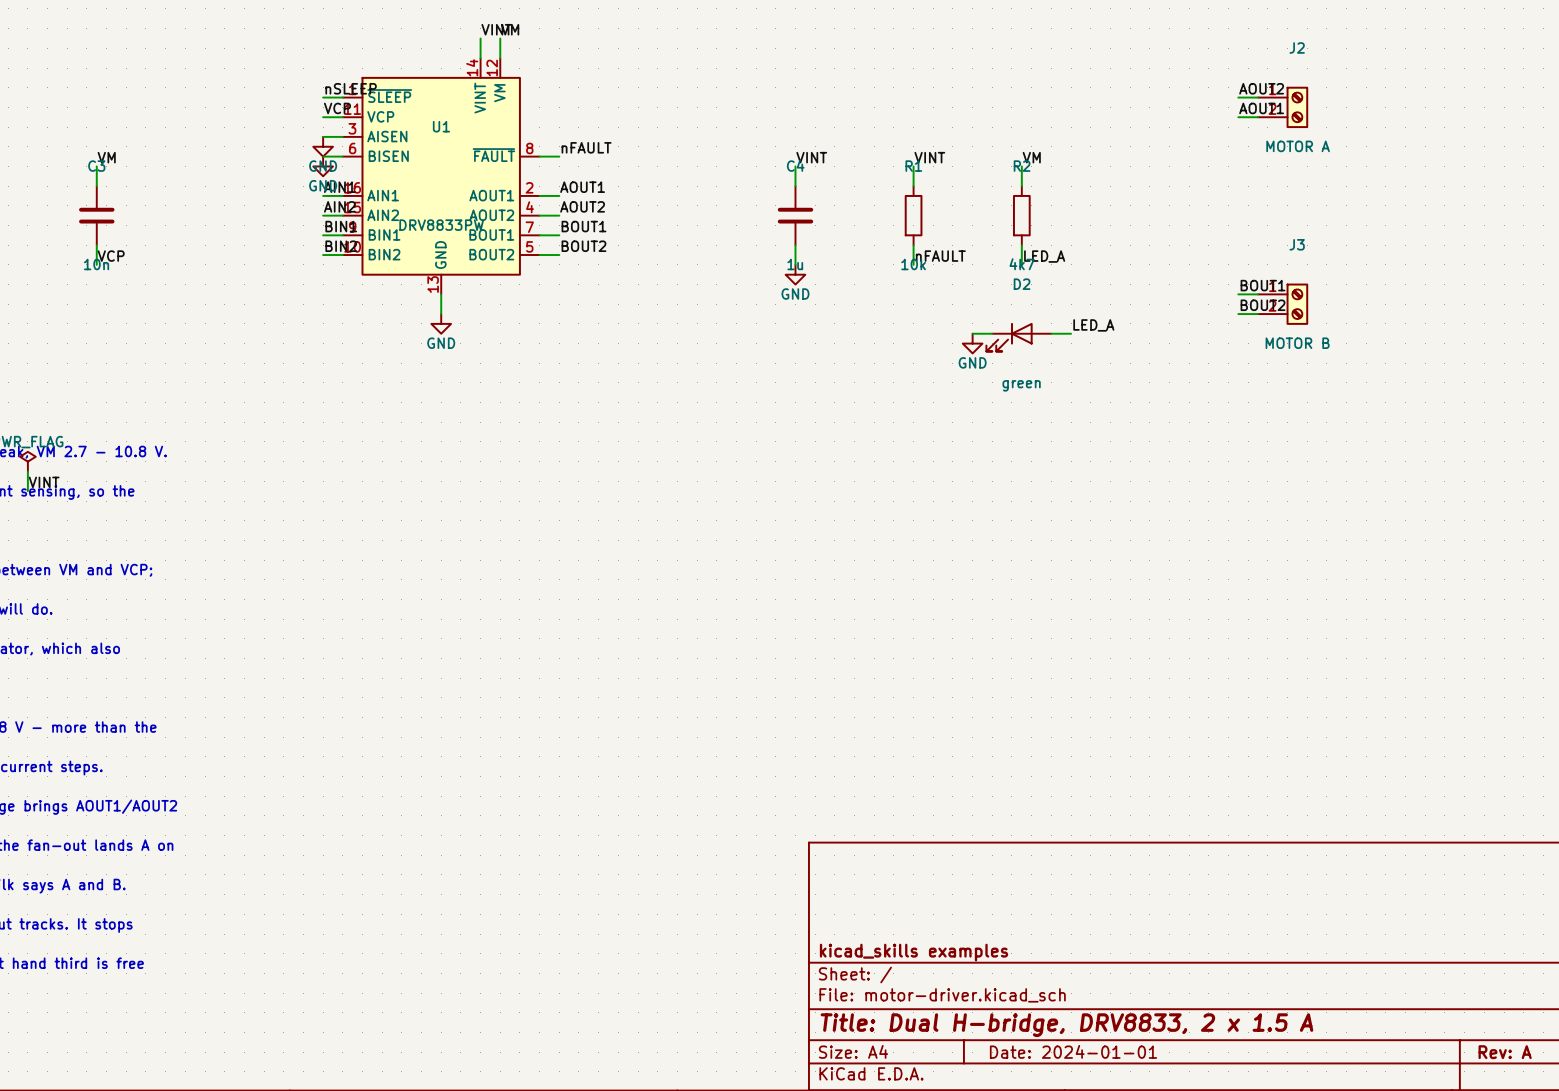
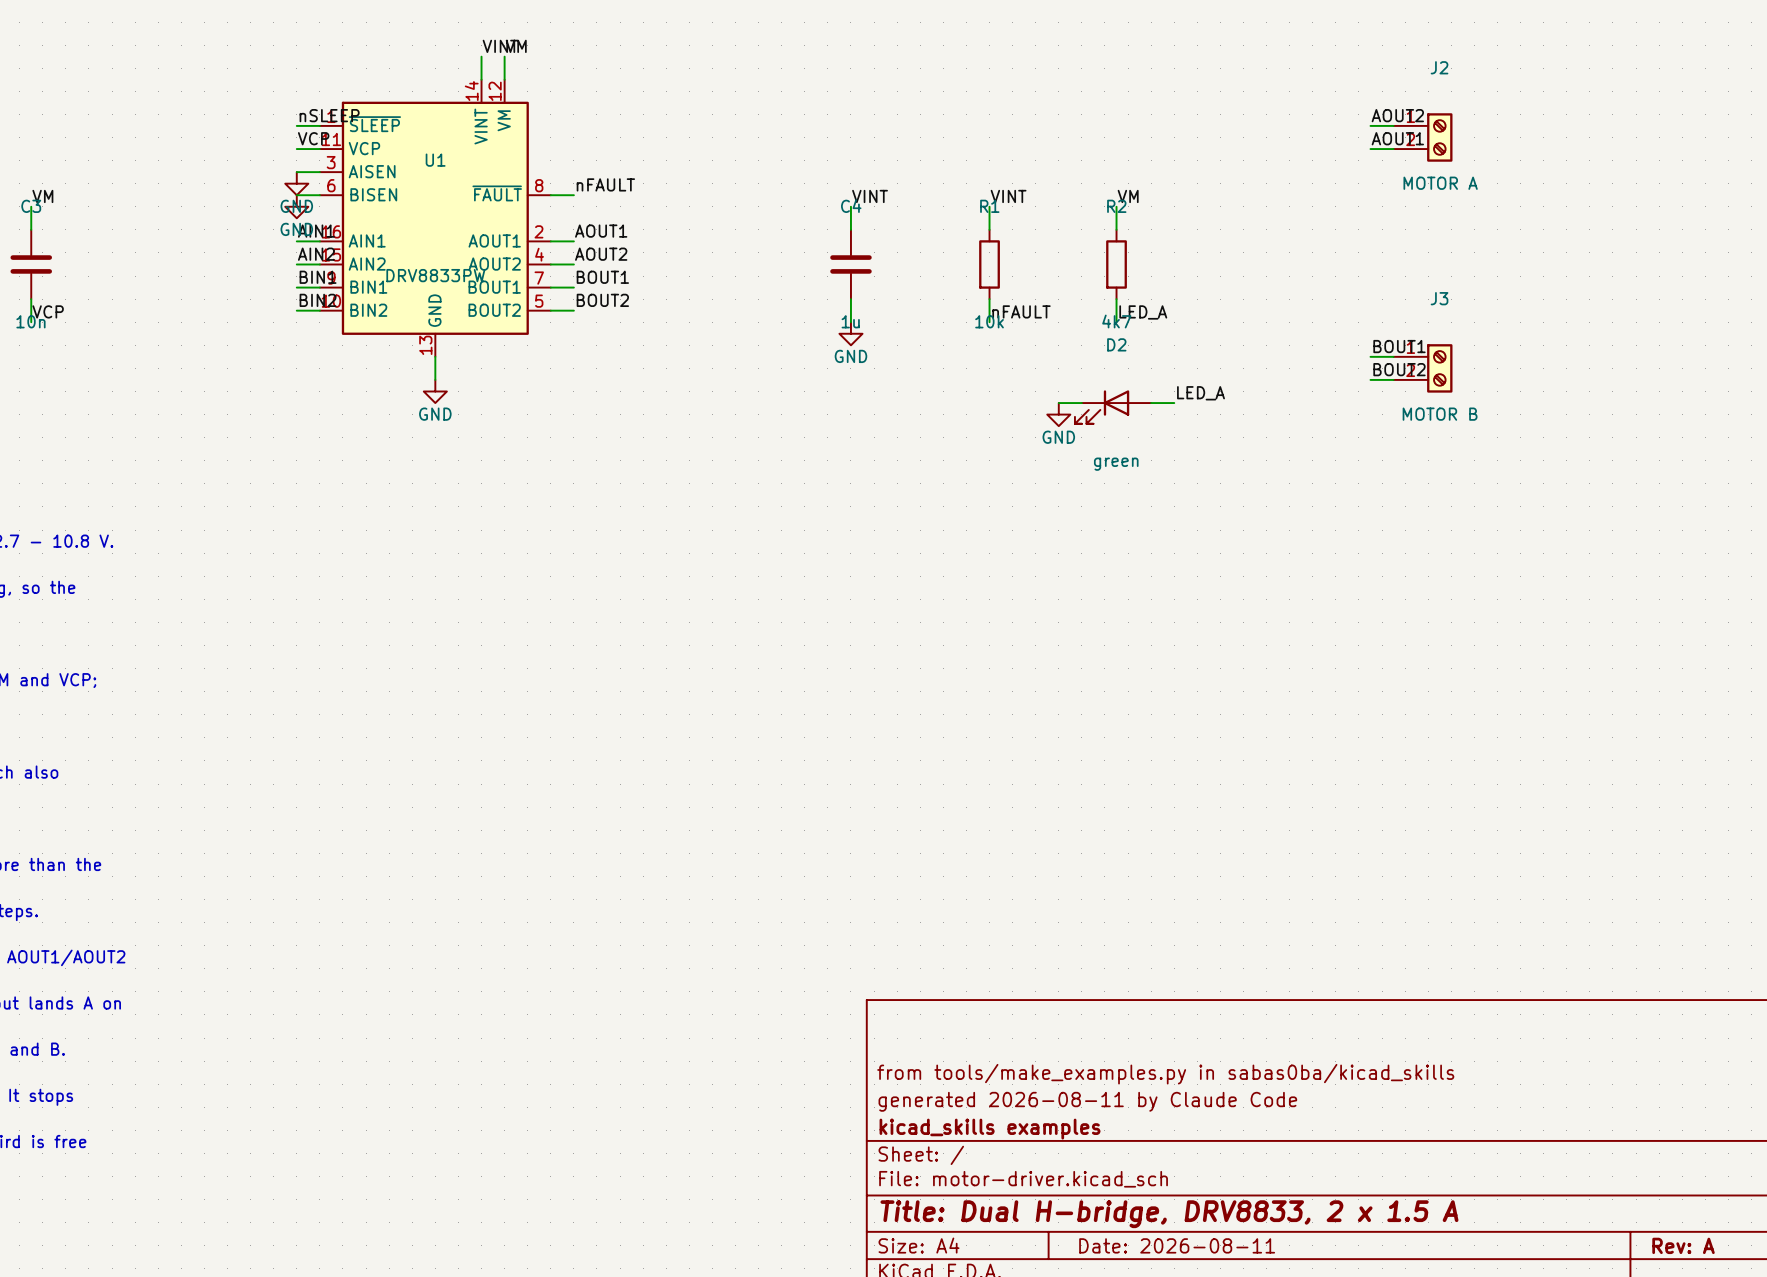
title block: none -> from tools/make_examples.py in sabas0ba/kicad_skills (1165, 1074)
title block: none -> generated 2026-08-11 by Claude Code (1087, 1101)
title block: Date: 2024-01-01 (1073, 1051) -> Date: 2026-08-11 (1177, 1245)

